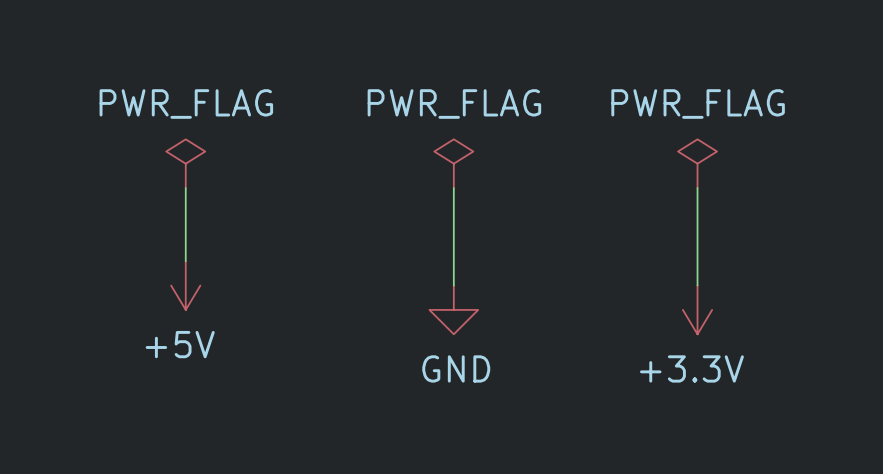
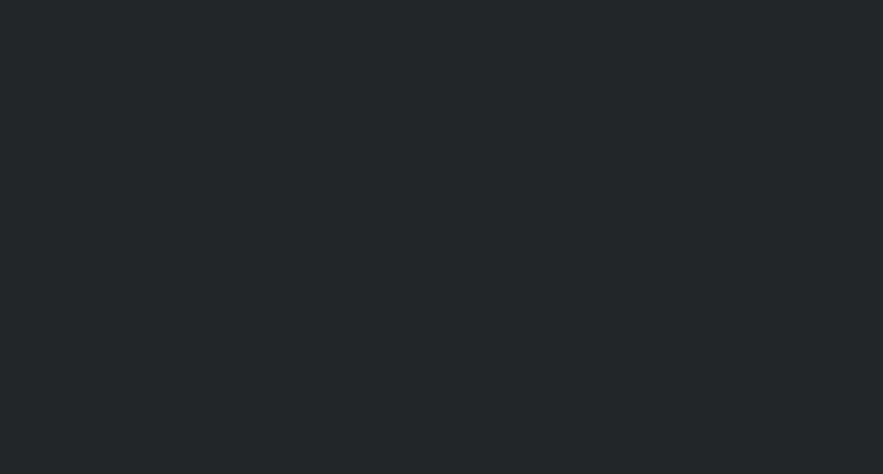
power symbol: PWR_FLAG (185, 163) -> none
power symbol: PWR_FLAG (453, 163) -> none
power symbol: PWR_FLAG (697, 163) -> none
wire: (185, 188) (185, 261) -> none
wire: (453, 188) (453, 285) -> none
wire: (697, 188) (697, 285) -> none
power symbol: +5V (185, 285) -> none
power symbol: GND (453, 309) -> none
power symbol: +3.3V (697, 309) -> none

